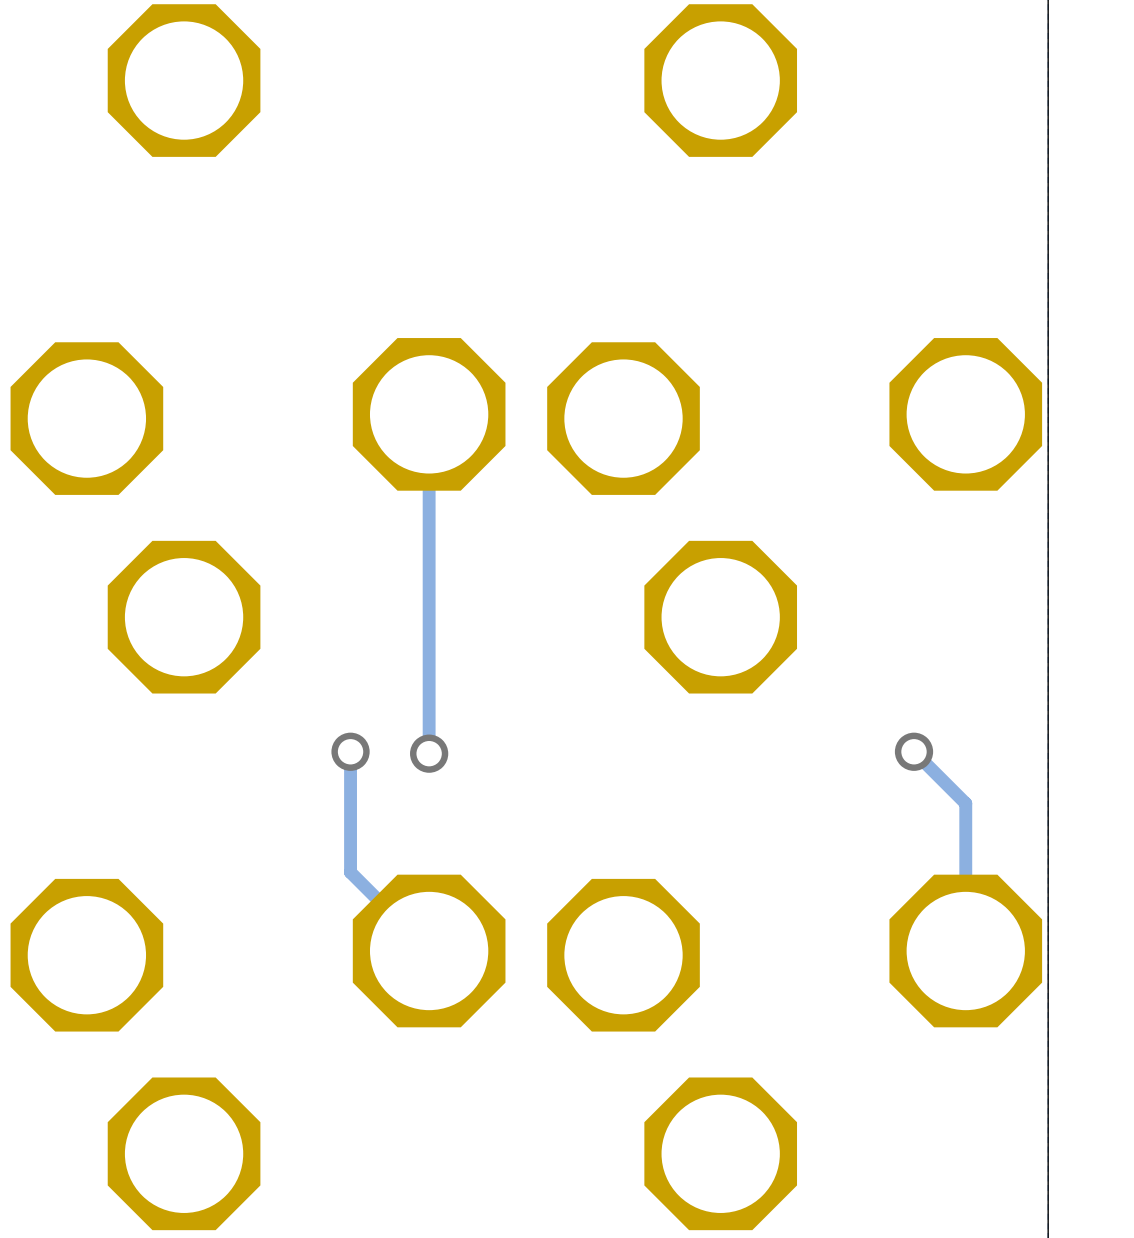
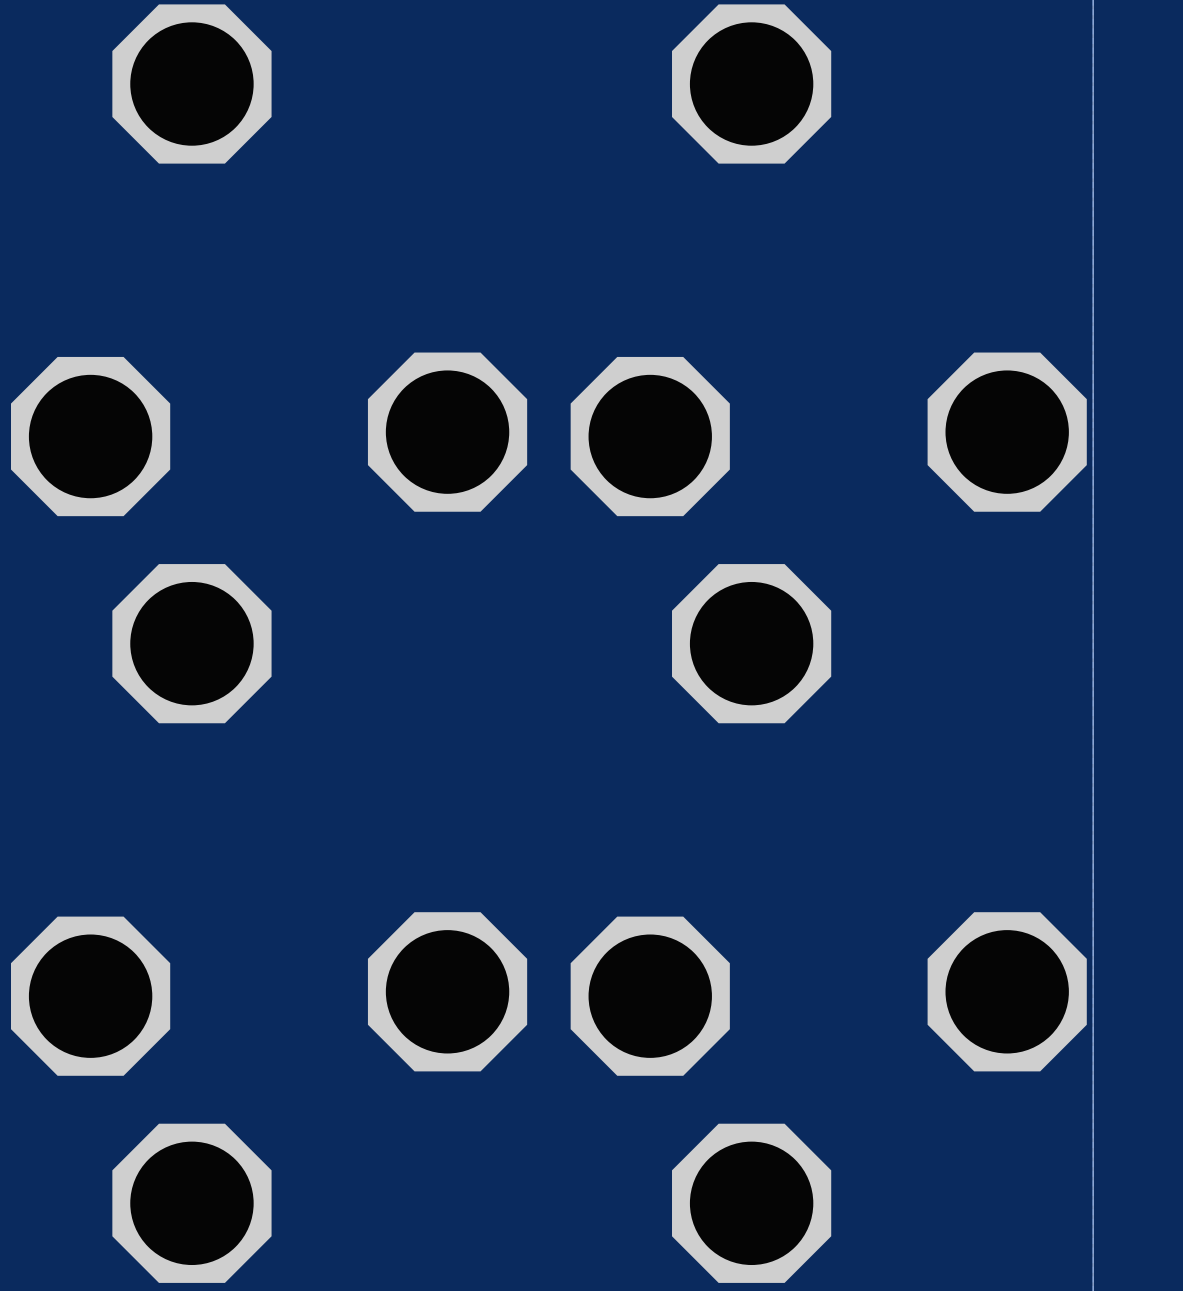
track: (429, 414) (429, 753) -> none
track: (350, 751) (350, 872) (429, 951) -> none
via: (350, 751) -> none
track: (914, 751) (965, 803) (965, 951) -> none
via: (914, 751) -> none
via: (429, 753) -> none

